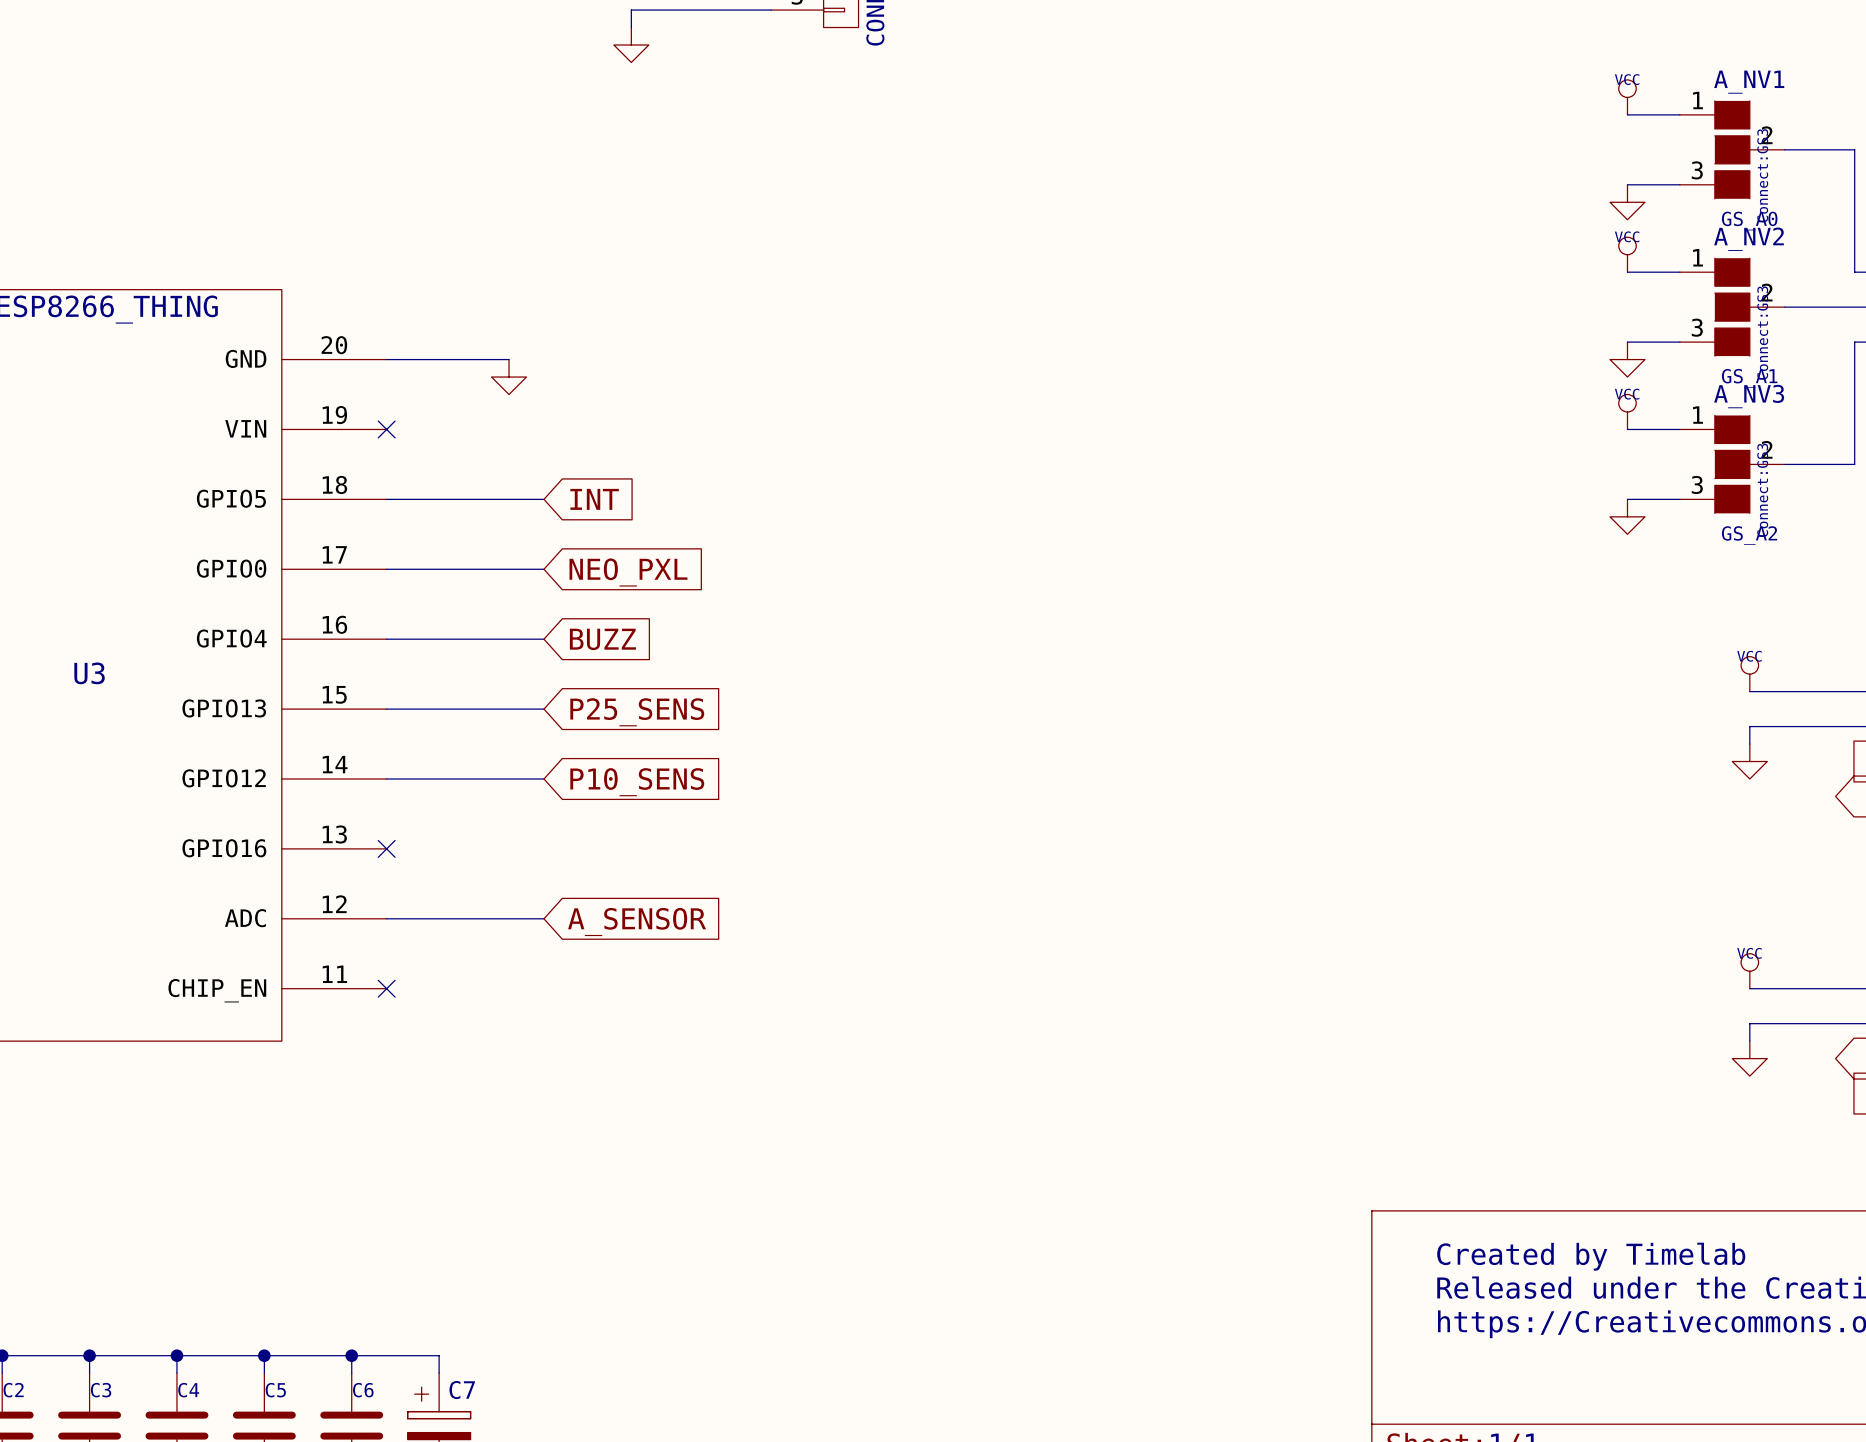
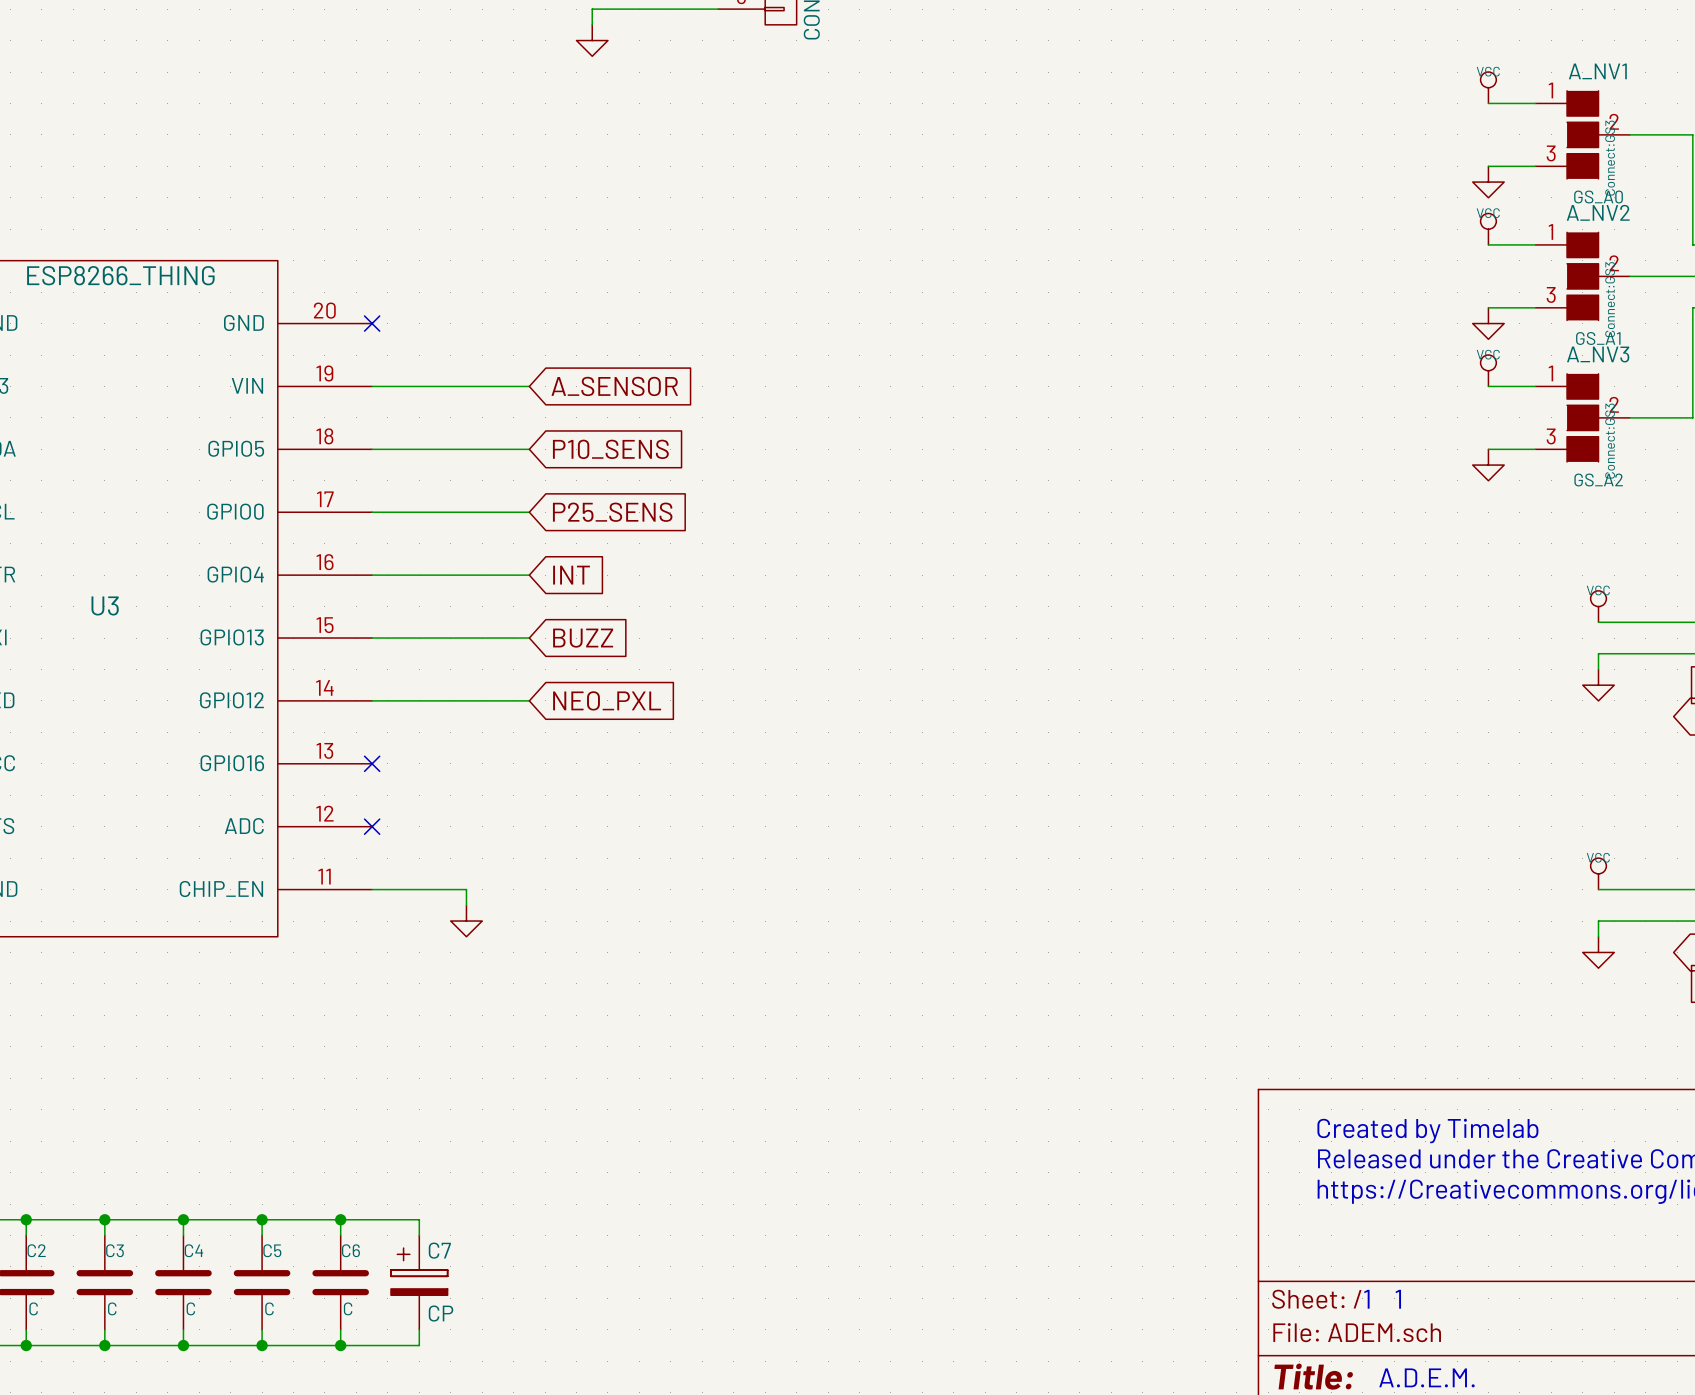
wire: (386, 359) (509, 359) -> none
power symbol: (509, 377) -> none
wire: none -> (372, 386) (529, 386)
no-connect mark position: (386, 429) -> (372, 323)
global label: none -> A_SENSOR (614, 386)
wire: none -> (513, 449) (529, 449)
global label position: INT (594, 499) -> INT (571, 575)
wire: none -> (513, 512) (529, 512)
global label position: NEO_PXL (628, 572) -> NEO_PXL (607, 700)
wire: none -> (513, 575) (529, 575)
global label position: BUZZ (602, 639) -> BUZZ (583, 638)
wire: none -> (513, 638) (529, 638)
global label position: P25_SENS (637, 712) -> P25_SENS (612, 512)
wire: none -> (513, 700) (529, 700)
global label position: P10_SENS (637, 782) -> P10_SENS (610, 449)
wire: (386, 918) (543, 918) -> none
global label: A_SENSOR (637, 922) -> none
wire: none -> (372, 889) (466, 889) (466, 905)
no-connect mark position: (386, 988) -> (372, 826)
power symbol: none -> (466, 921)

